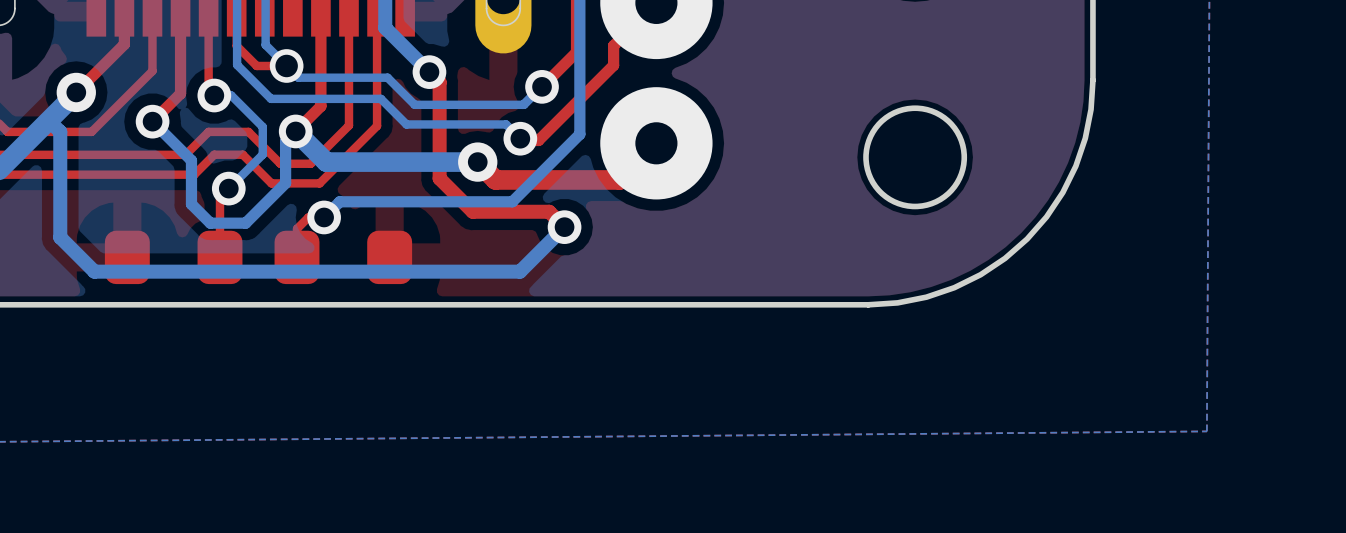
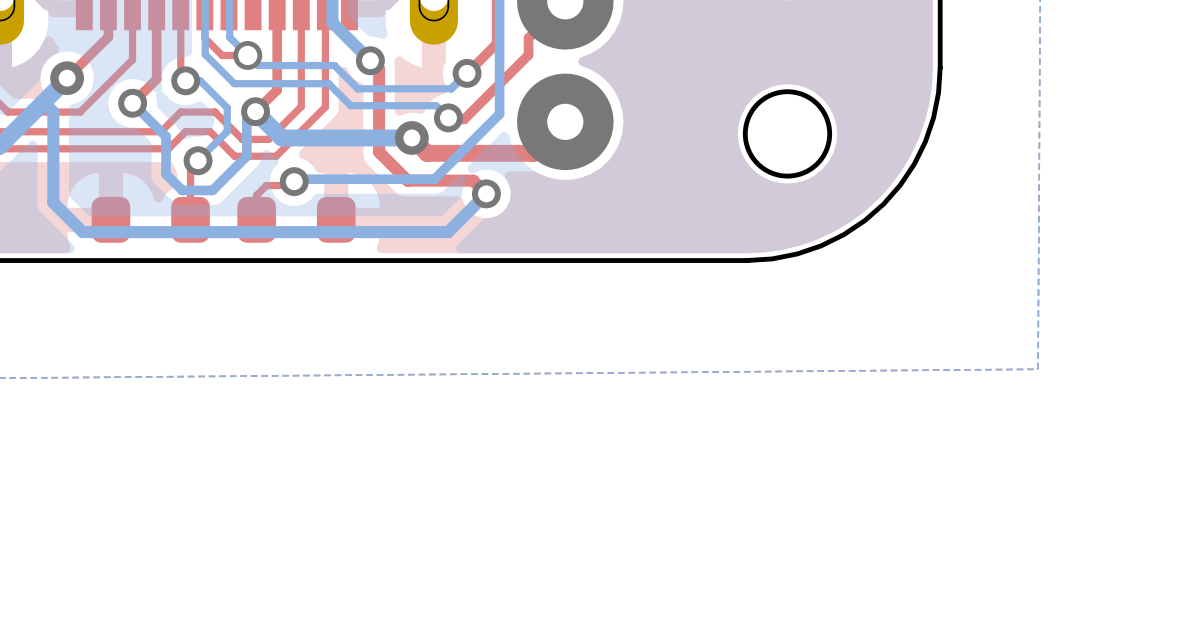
bottom track: (512, 201) (339, 201) (324, 217) -> (441, 172) (434, 179) (296, 179) (294, 181)
via position: (324, 217) -> (294, 181)

